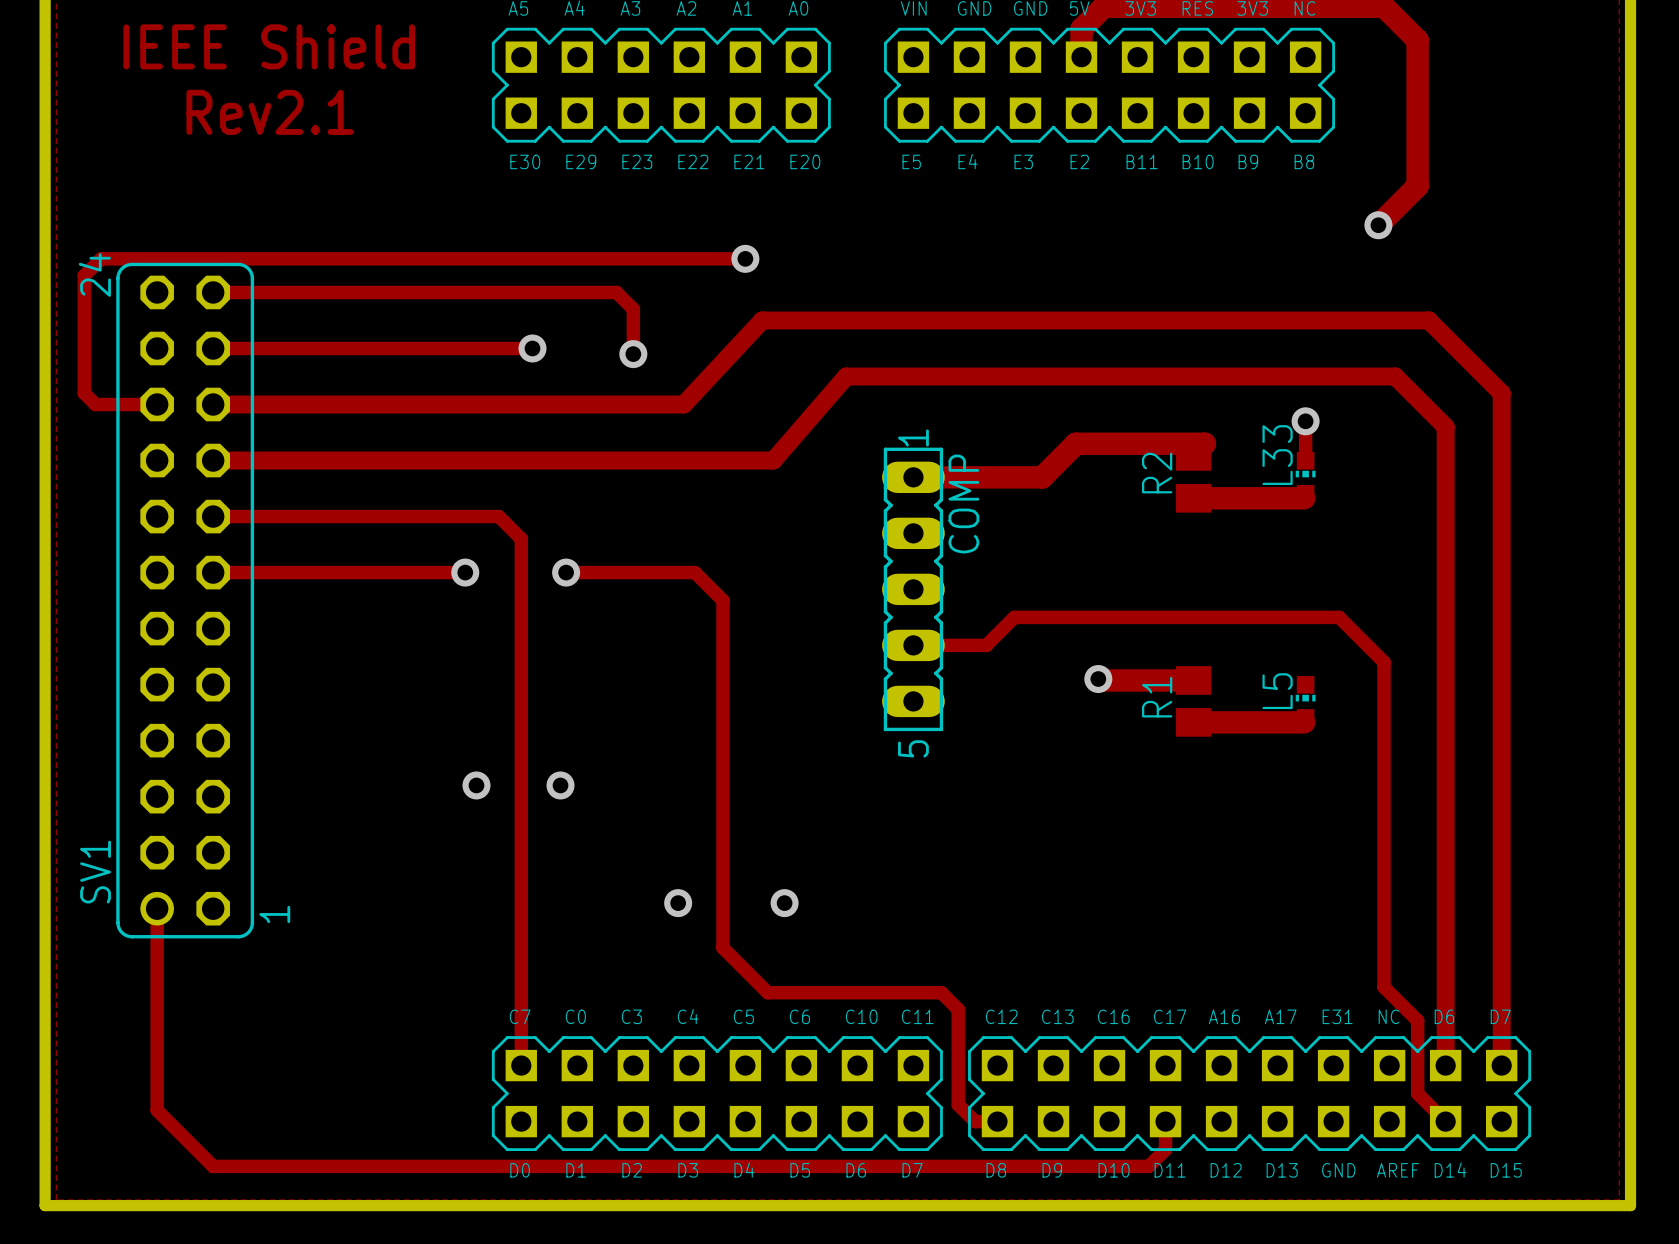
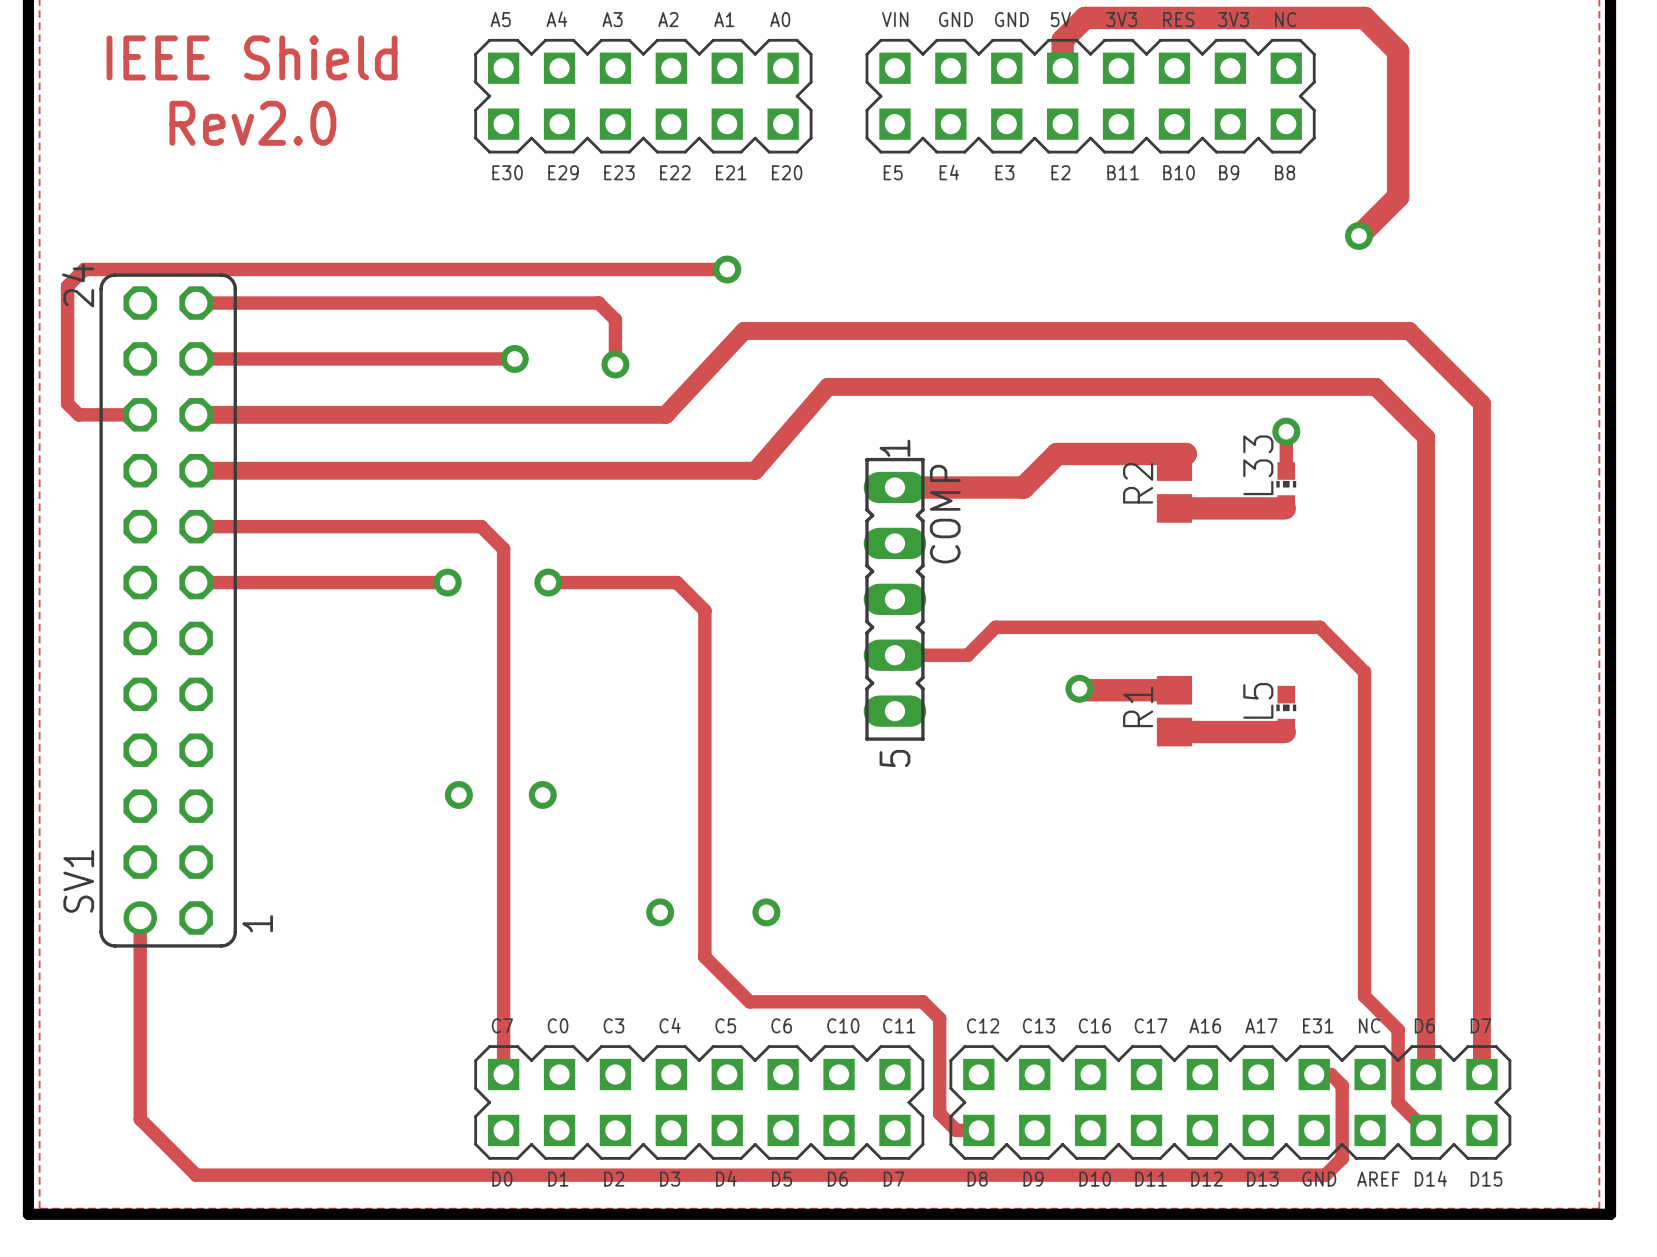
text: Rev2.1 (270, 112) -> Rev2.0 (252, 123)
track: (1165, 1121) (1165, 1149) (1148, 1166) -> (1314, 1074) (1331, 1074) (1342, 1085) (1342, 1158) (1325, 1175) (1129, 1175)

